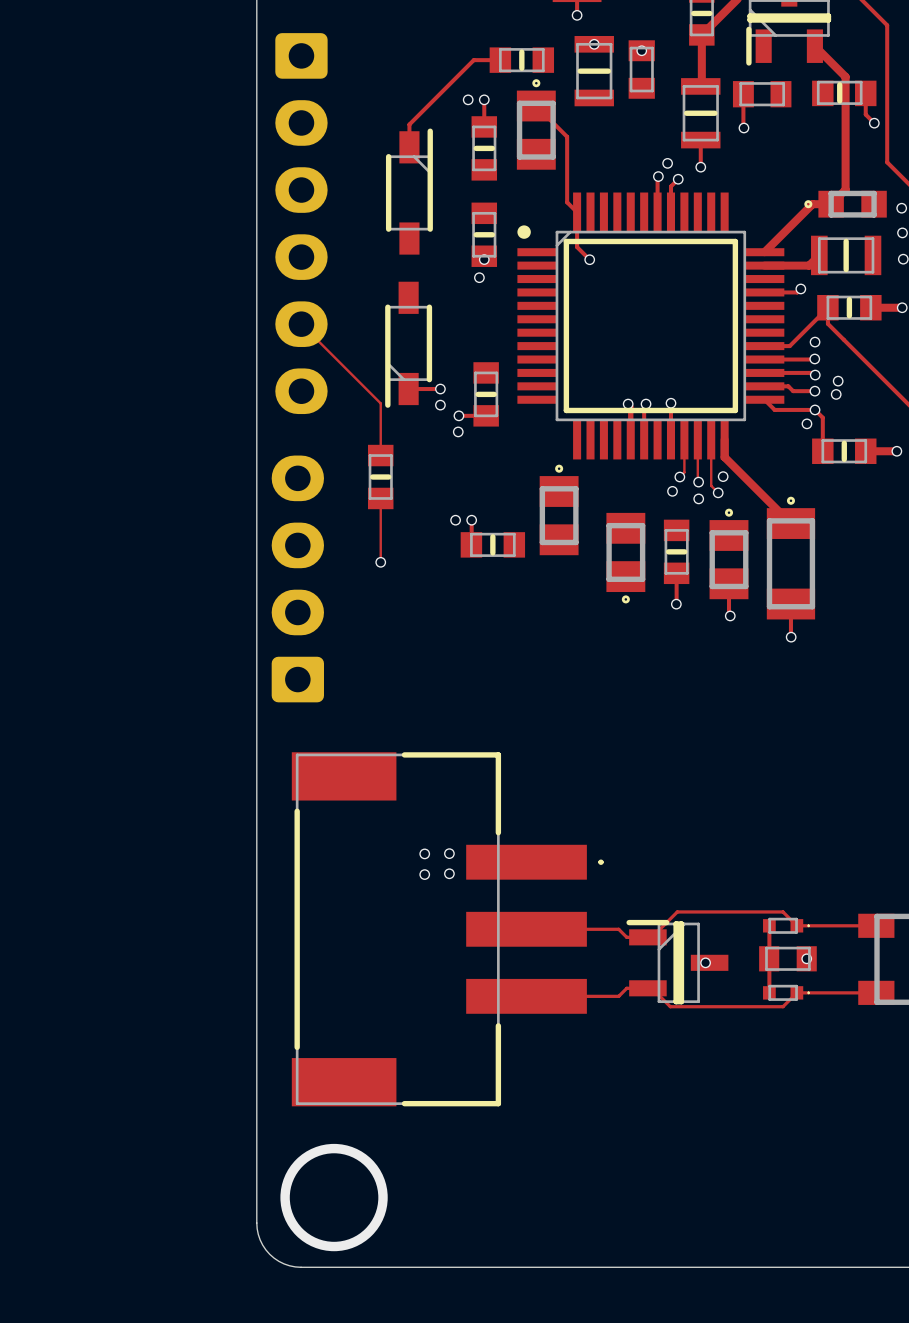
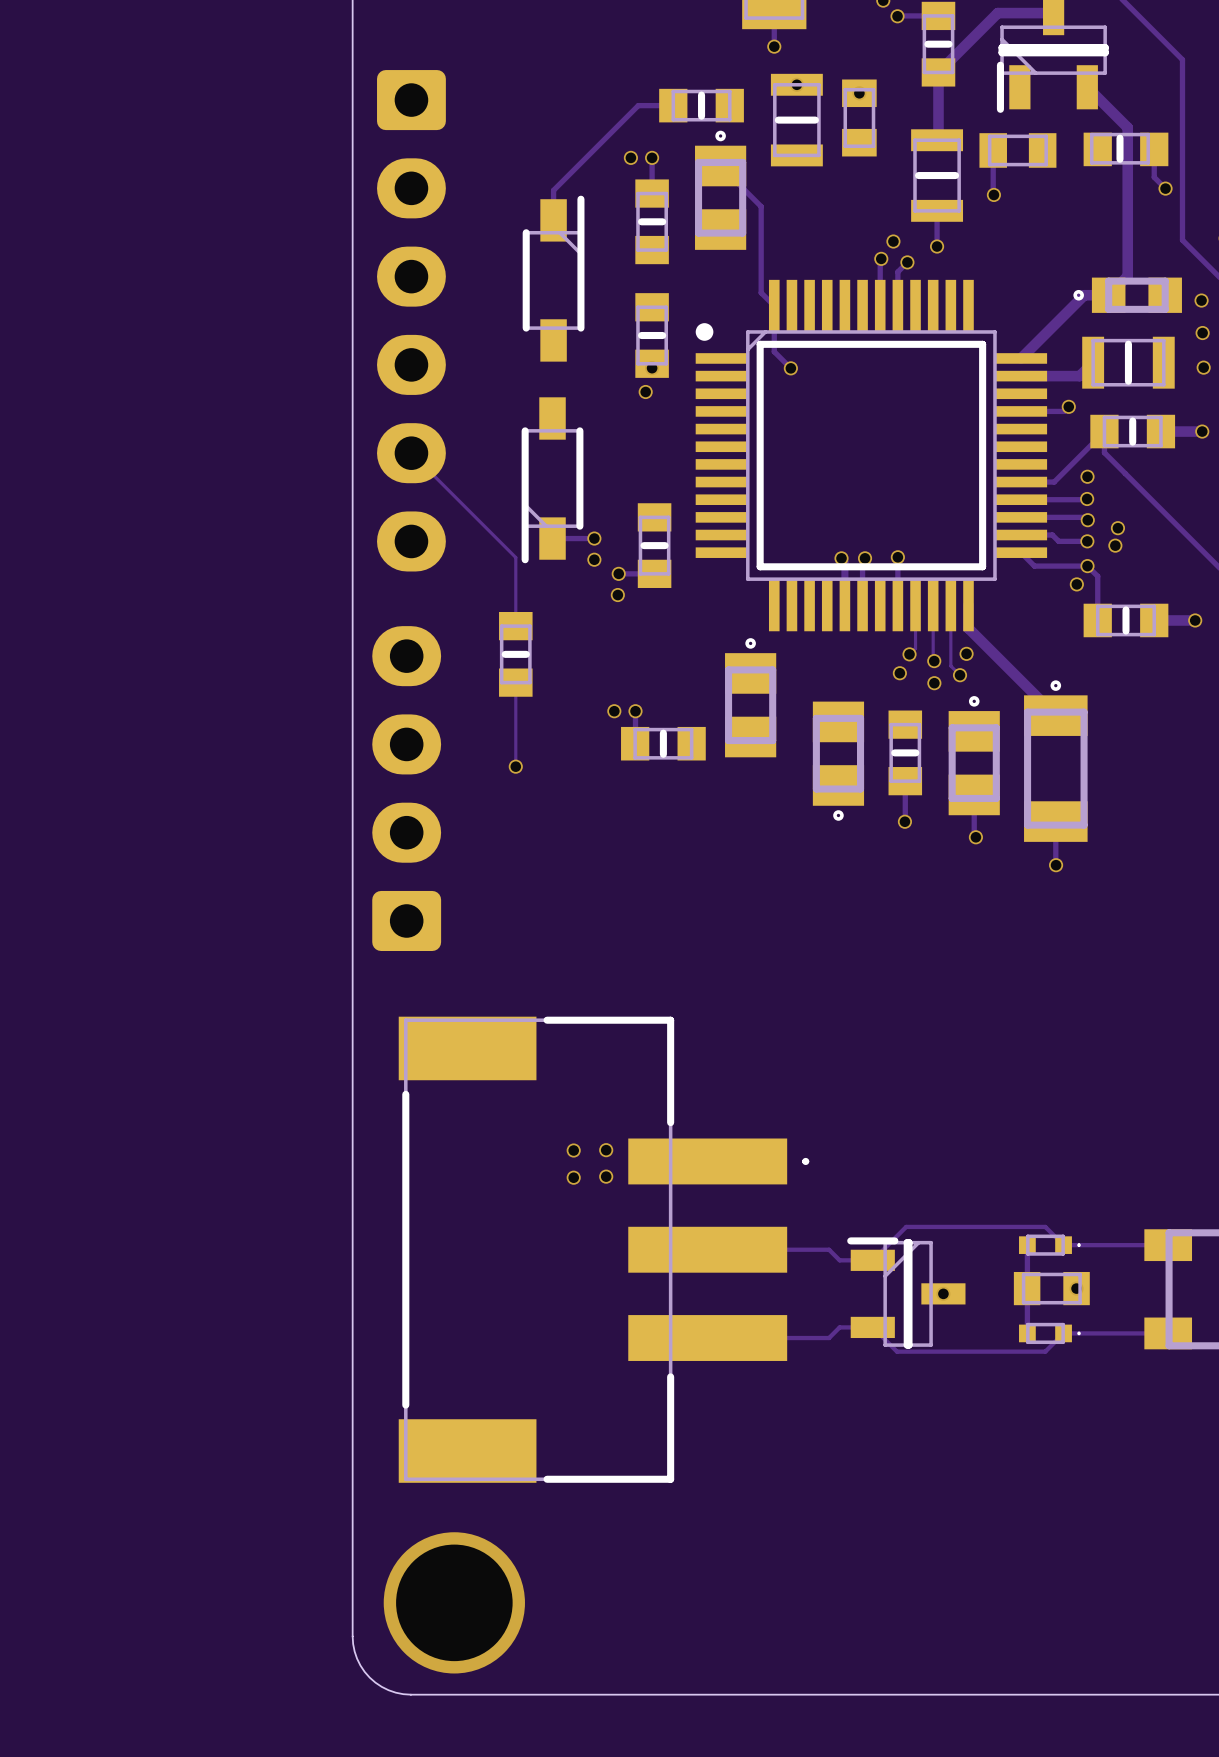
part footprint: [626, 919, 729, 1005] -> [847, 1237, 966, 1349]

